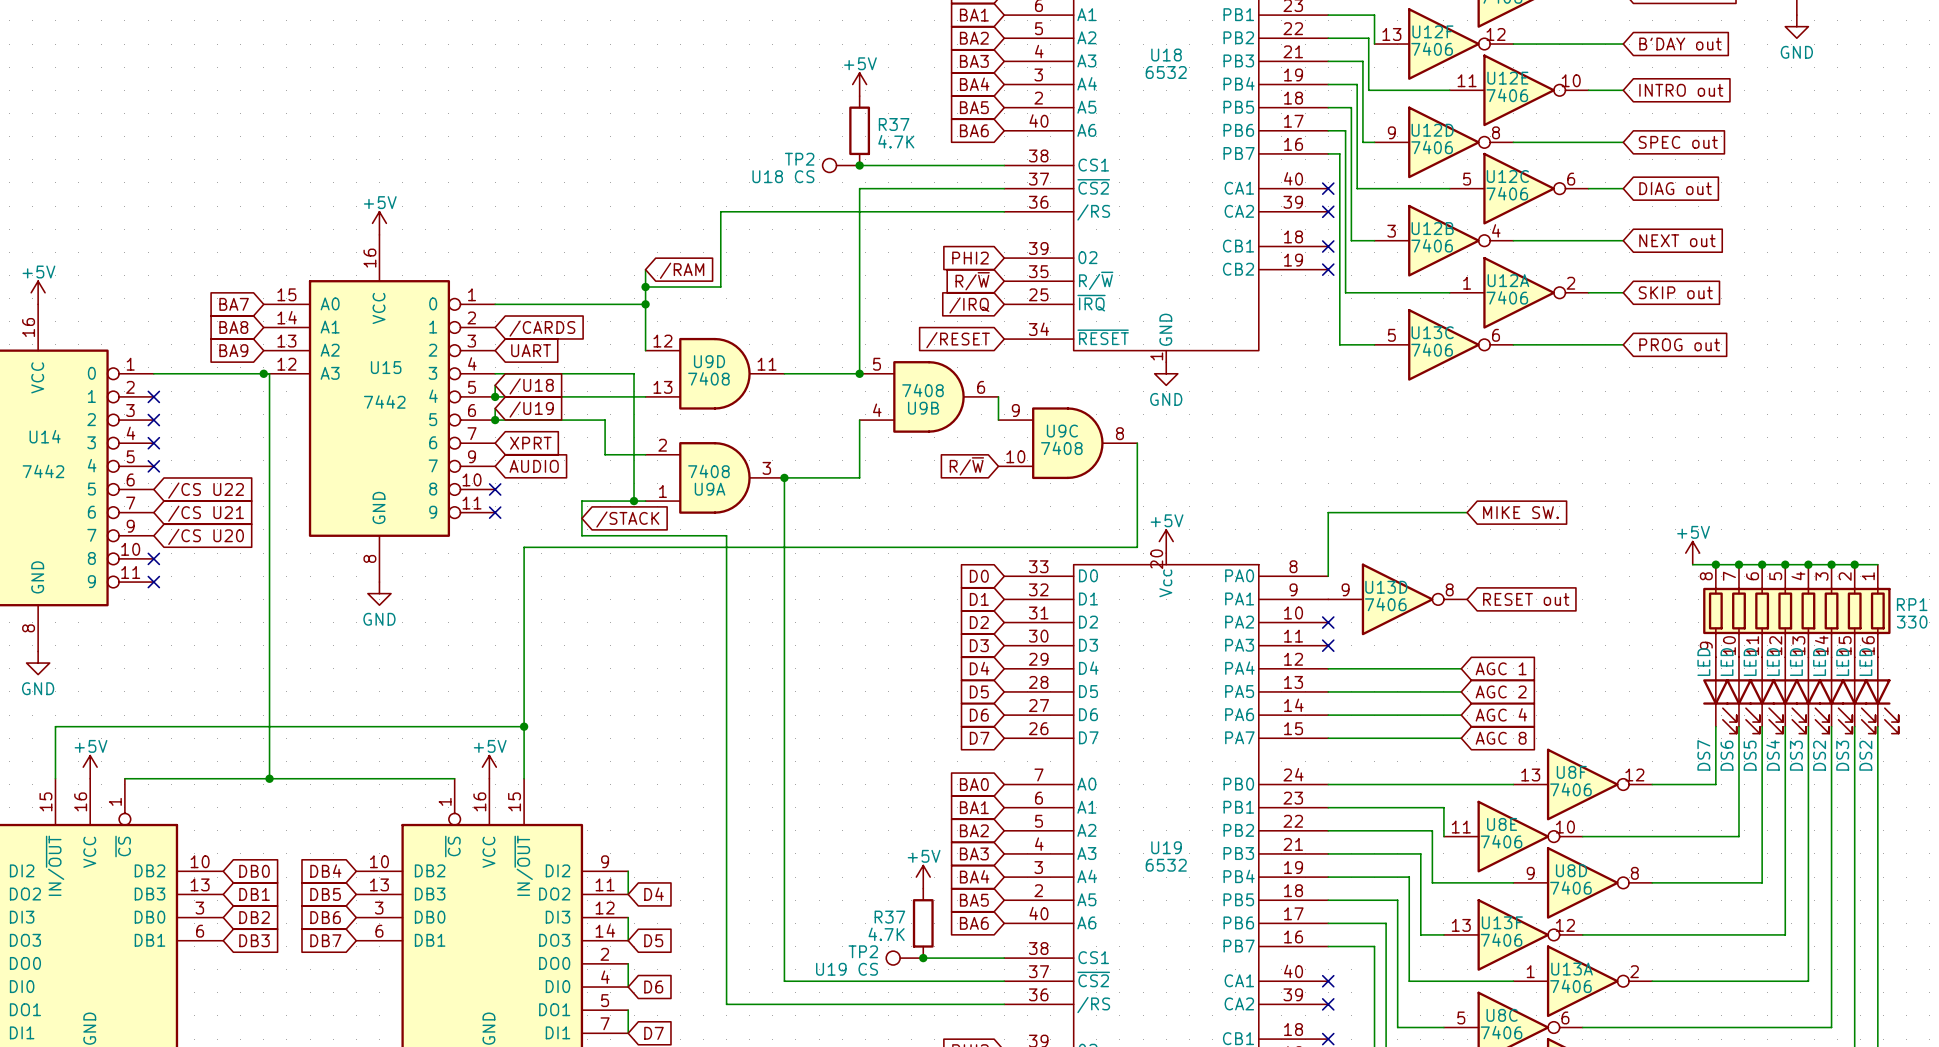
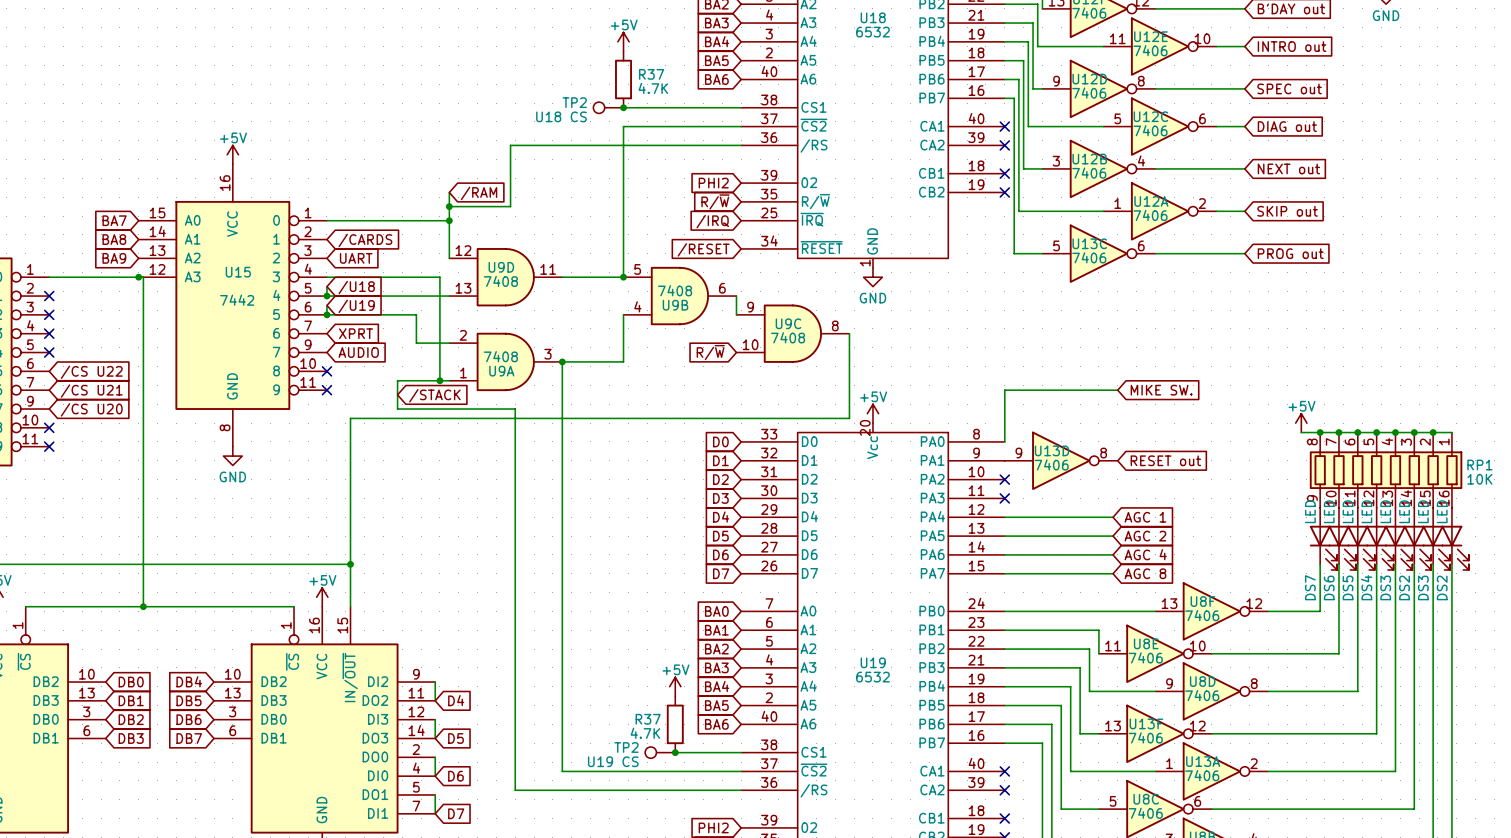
RP1 value: 330 (1912, 622) -> 10K (1479, 479)

